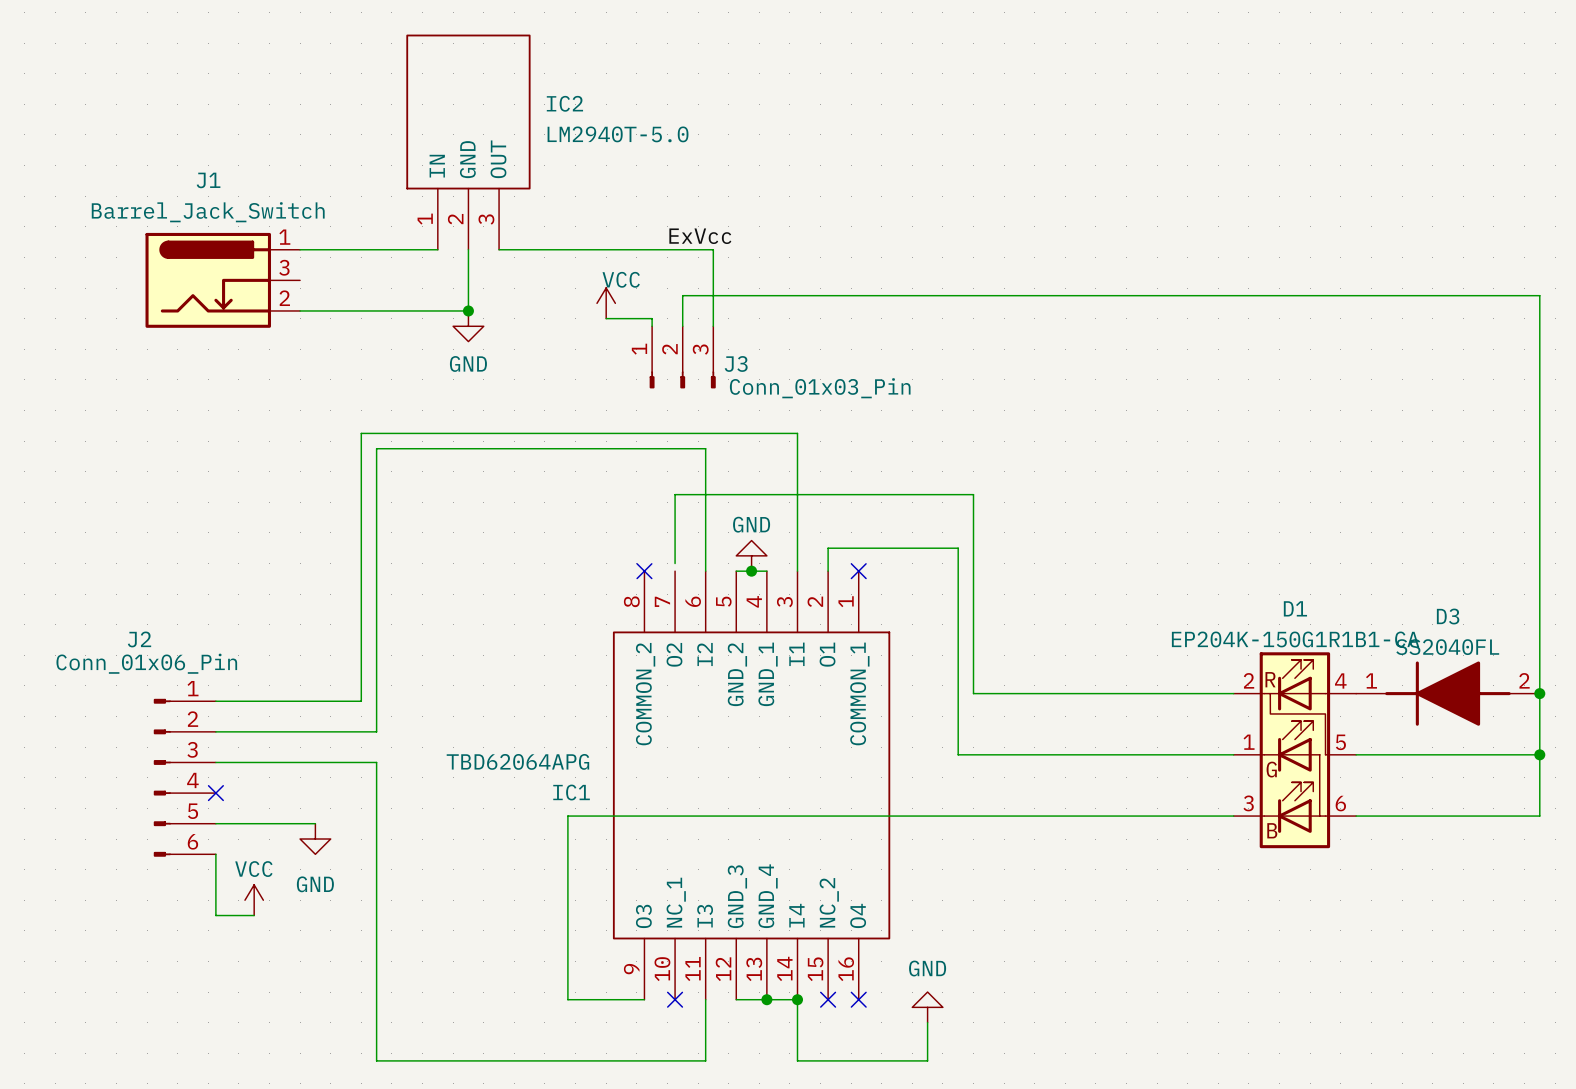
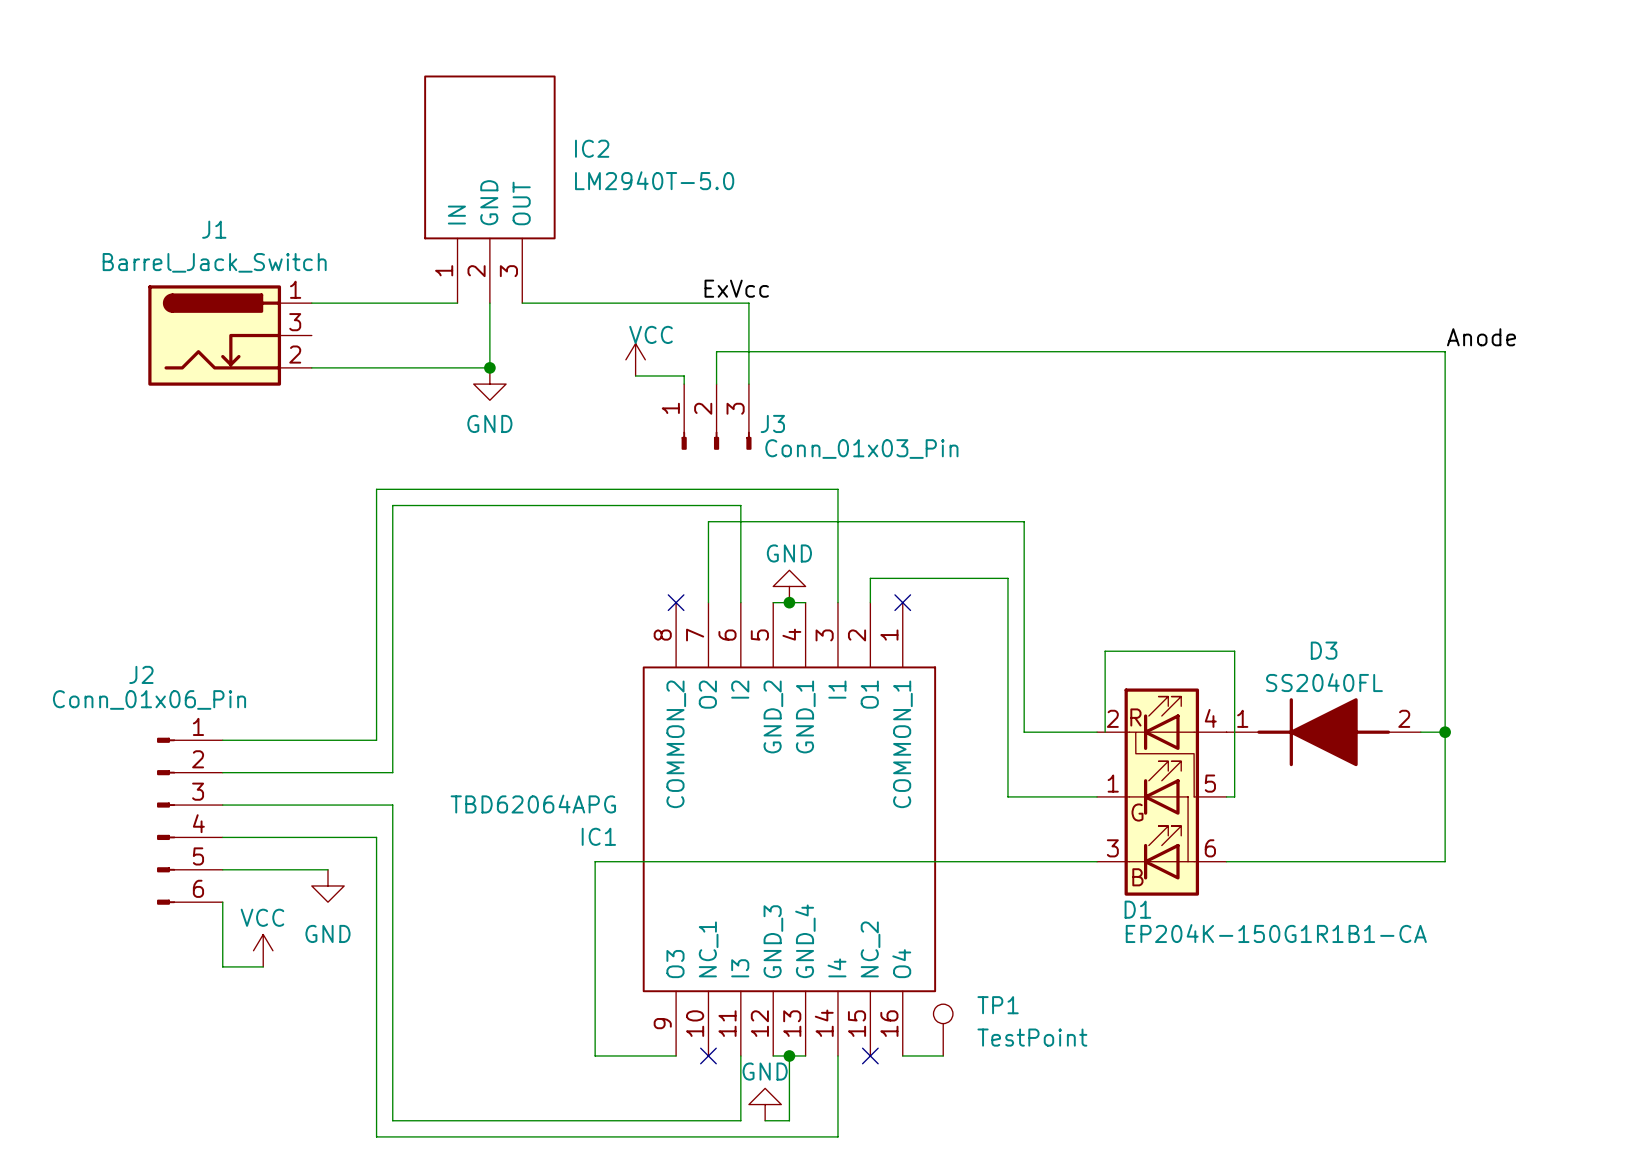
IC2 position: (468, 142) -> (489, 189)
label position: ExVcc (700, 236) -> ExVcc (736, 288)
wire: (300, 249) (437, 249) -> (311, 303) (457, 303)
wire: (499, 249) (713, 249) (713, 288) -> (522, 303) (748, 303)
J1 position: (222, 280) -> (230, 335)
power symbol position: VCC (606, 303) -> VCC (635, 359)
wire: (300, 310) (468, 310) -> (311, 367) (489, 367) (489, 327)
junction position: (468, 310) -> (489, 367)
wire: (606, 318) (652, 318) (652, 326) -> (635, 375) (684, 375) (684, 384)
label: none -> Anode (1481, 337)
power symbol position: GND (468, 326) -> GND (489, 384)
wire: (682, 326) (682, 295) (1539, 295) (1539, 816) (1371, 816) -> (716, 384) (716, 351) (1445, 351) (1445, 861)
J3 position: (682, 357) -> (716, 416)
wire: (361, 464) (361, 433) (797, 433) (797, 464) -> (376, 489) (837, 489)
wire: (376, 479) (376, 448) (705, 448) (705, 479) -> (392, 505) (740, 505)
wire: none -> (708, 594) (708, 602)
D1 name position: D1 (1295, 608) -> D1 (1137, 909)
D1 value position: EP204K-150G1R1B1-CA (1295, 639) -> EP204K-150G1R1B1-CA (1276, 933)
junction: none -> (1445, 732)
D3 position: (1447, 693) -> (1323, 732)
junction: (1539, 693) -> none
D1 position: (1294, 750) -> (1161, 792)
wire: (1172, 754) (1233, 754) -> (1234, 796) (1234, 651) (1105, 651) (1105, 732)
wire: (1356, 754) (1539, 754) -> none
junction: (1539, 754) -> none
no-connect mark: (215, 793) -> none
power symbol text position: GND (927, 968) -> GND (765, 1071)
TP1: none -> TestPoint (943, 1030)
wire: none -> (789, 1055) (789, 1120) (765, 1120)
wire: (766, 999) (797, 999) -> none
junction position: (766, 999) -> (789, 1055)
junction: (797, 999) -> none
wire: none -> (902, 1055) (943, 1055)
no-connect mark: (858, 999) -> none
power symbol position: GND (927, 1007) -> GND (765, 1104)
wire: (927, 1022) (927, 1060) (797, 1060) -> (222, 837) (376, 837) (376, 1136) (837, 1136) (837, 1120)

